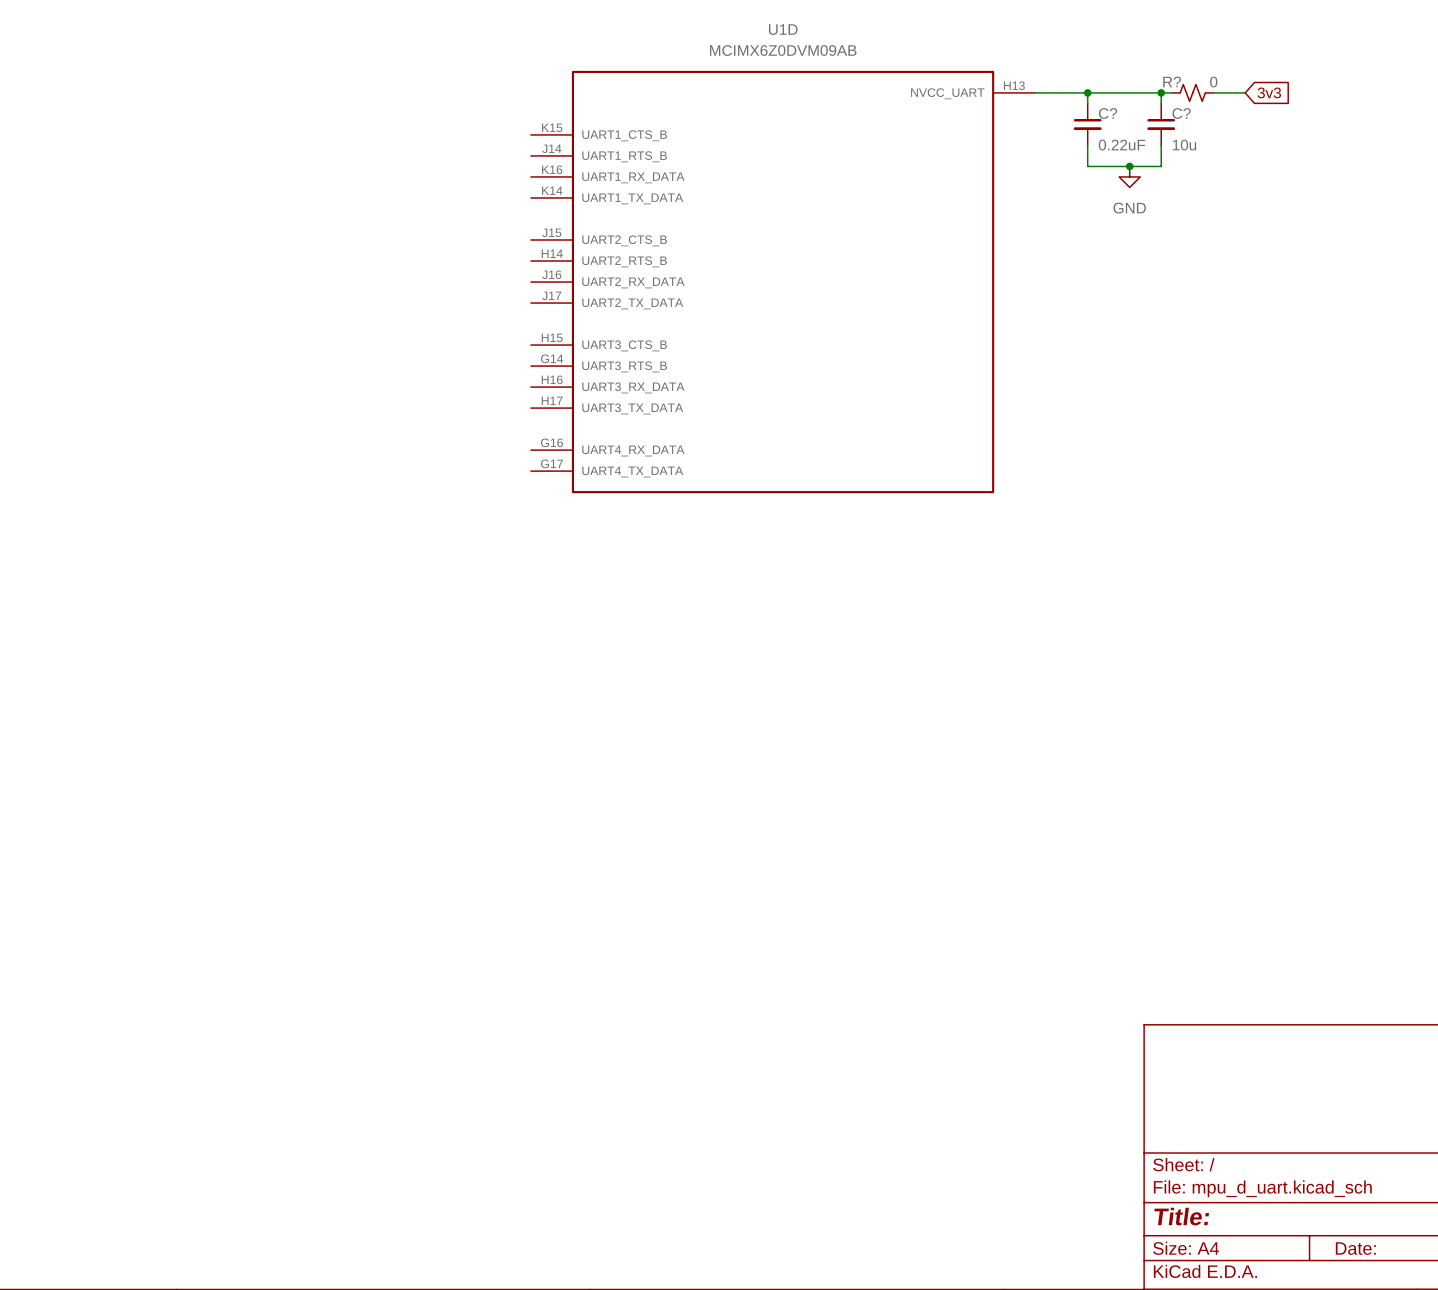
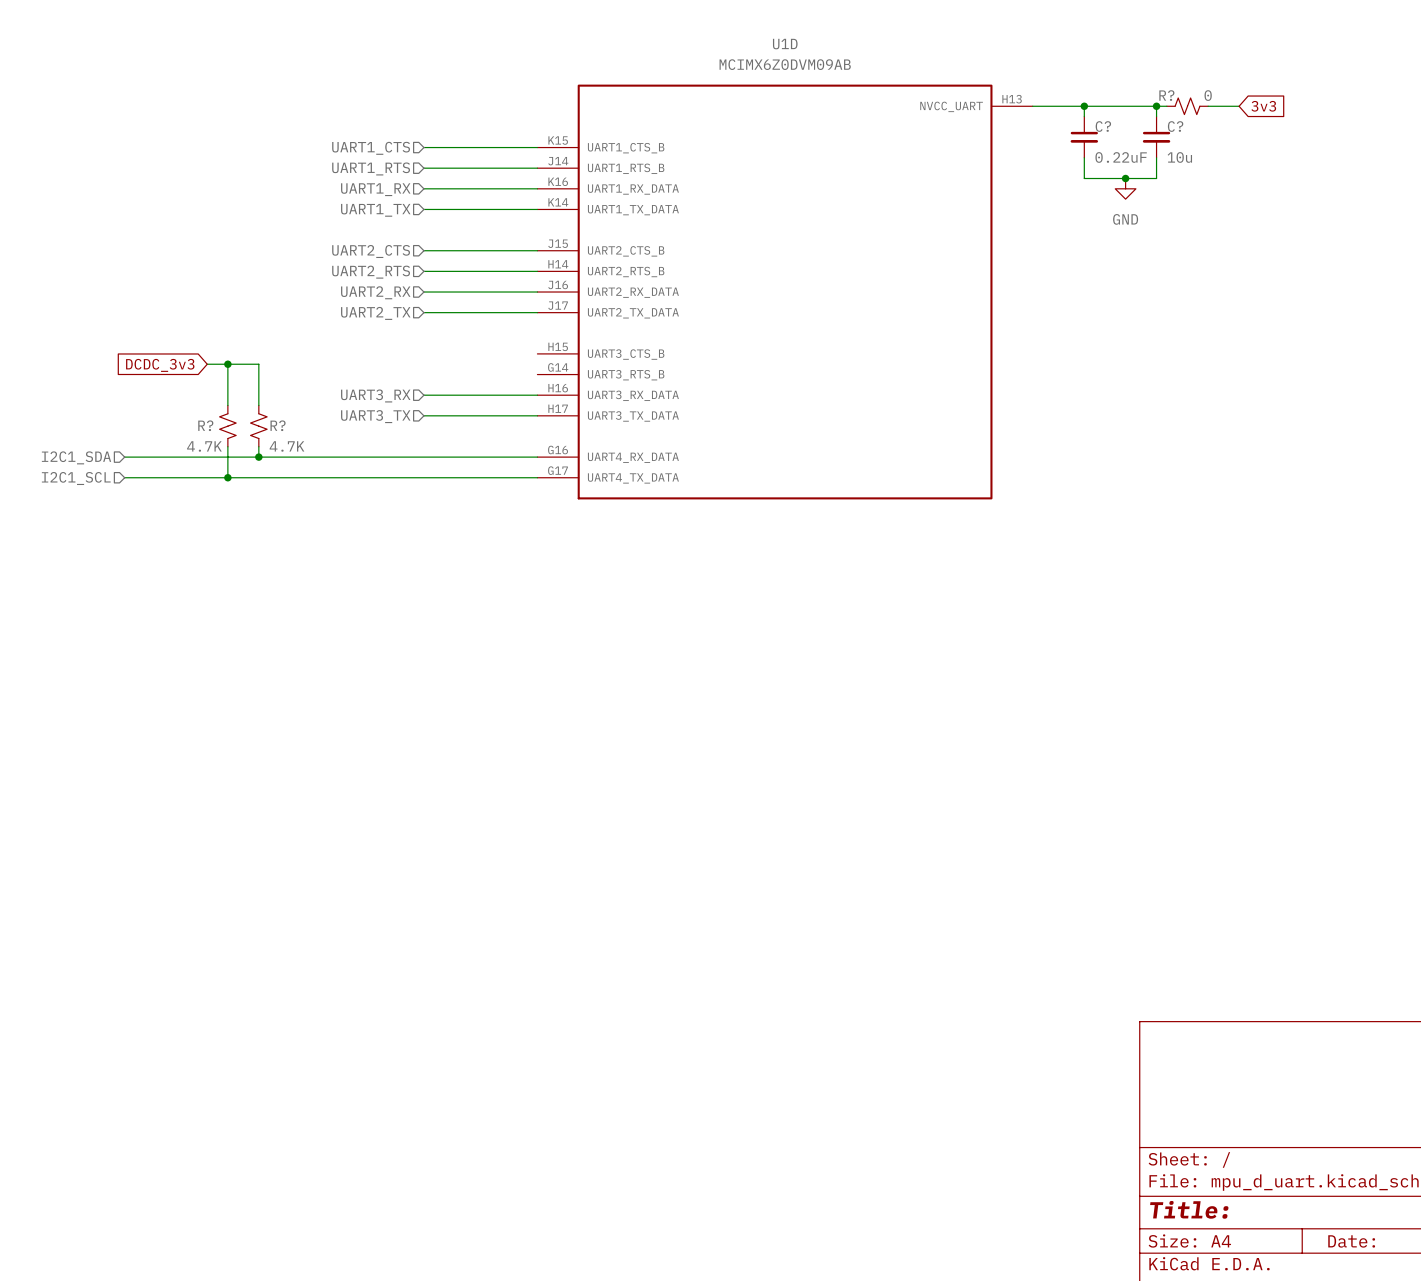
wire: none -> (423, 147) (537, 147)
hierarchical label: none -> UART1_CTS (371, 148)
wire: none -> (423, 168) (537, 168)
hierarchical label: none -> UART1_RTS (371, 168)
wire: none -> (423, 188) (537, 188)
hierarchical label: none -> UART1_RX (375, 189)
wire: none -> (423, 209) (537, 209)
hierarchical label: none -> UART1_TX (375, 210)
wire: none -> (423, 250) (537, 250)
hierarchical label: none -> UART2_CTS (371, 251)
wire: none -> (423, 271) (537, 271)
hierarchical label: none -> UART2_RTS (371, 272)
wire: none -> (423, 292) (537, 292)
hierarchical label: none -> UART2_RX (375, 292)
wire: none -> (423, 312) (537, 312)
hierarchical label: none -> UART2_TX (375, 313)
wire: none -> (207, 364) (258, 364) (258, 405)
wire: none -> (227, 364) (227, 405)
junction: none -> (227, 364)
global label: none -> DCDC_3v3 (160, 365)
wire: none -> (423, 395) (537, 395)
hierarchical label: none -> UART3_RX (375, 395)
wire: none -> (423, 415) (537, 415)
hierarchical label: none -> UART3_TX (375, 416)
R?: none -> 4.7K (227, 426)
R?: none -> 4.7K (258, 426)
wire: none -> (227, 446) (227, 477)
wire: none -> (258, 446) (258, 457)
wire: none -> (124, 457) (537, 457)
junction: none -> (258, 457)
hierarchical label: none -> I2C1_SDA (76, 457)
wire: none -> (124, 477) (537, 477)
junction: none -> (227, 477)
hierarchical label: none -> I2C1_SCL (76, 478)

